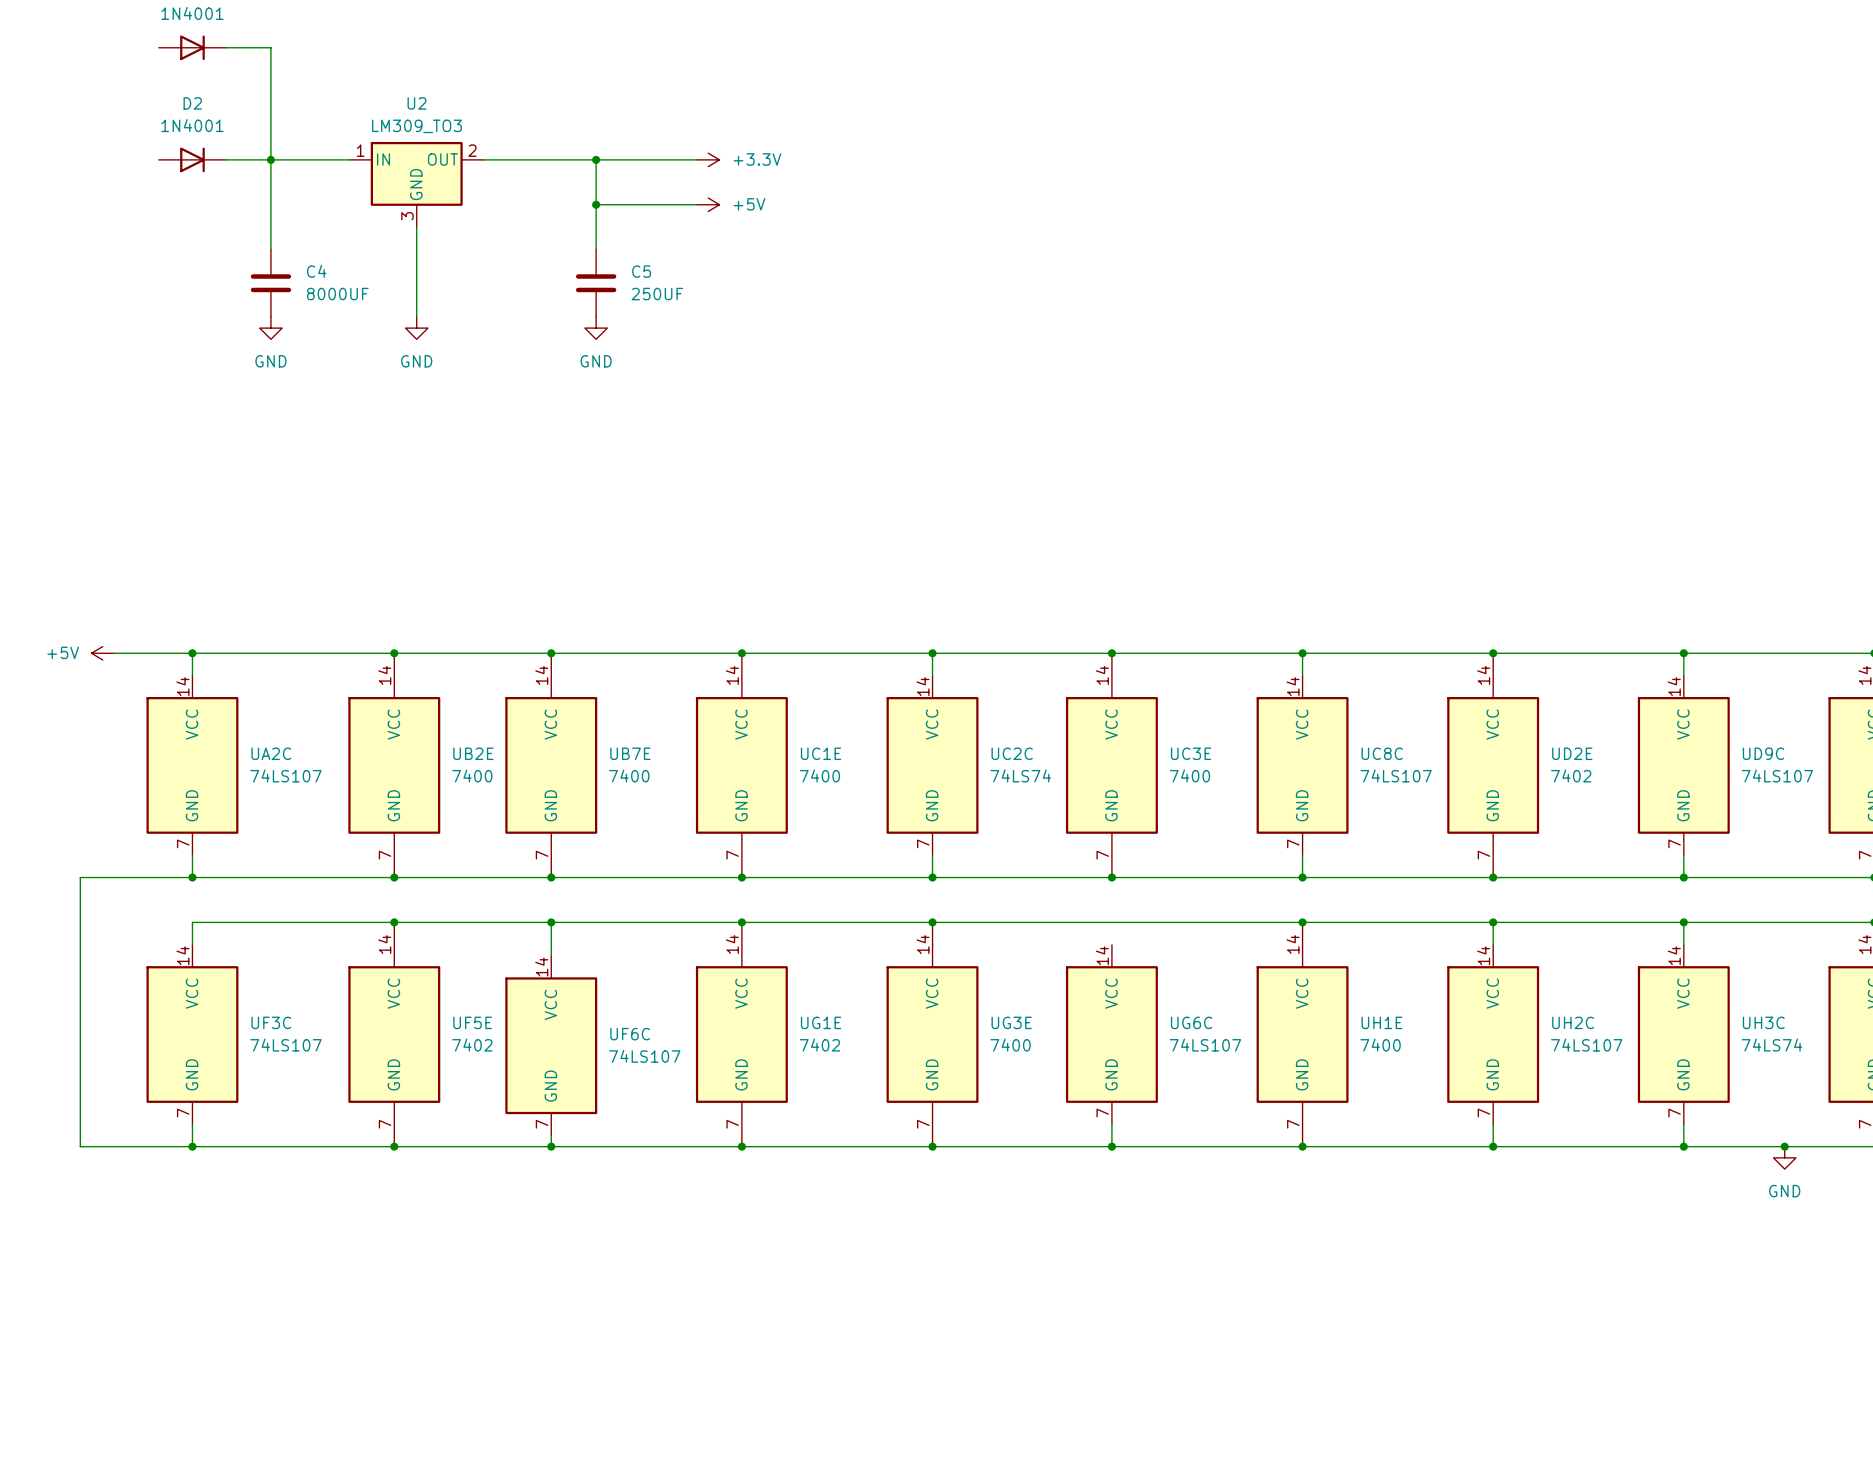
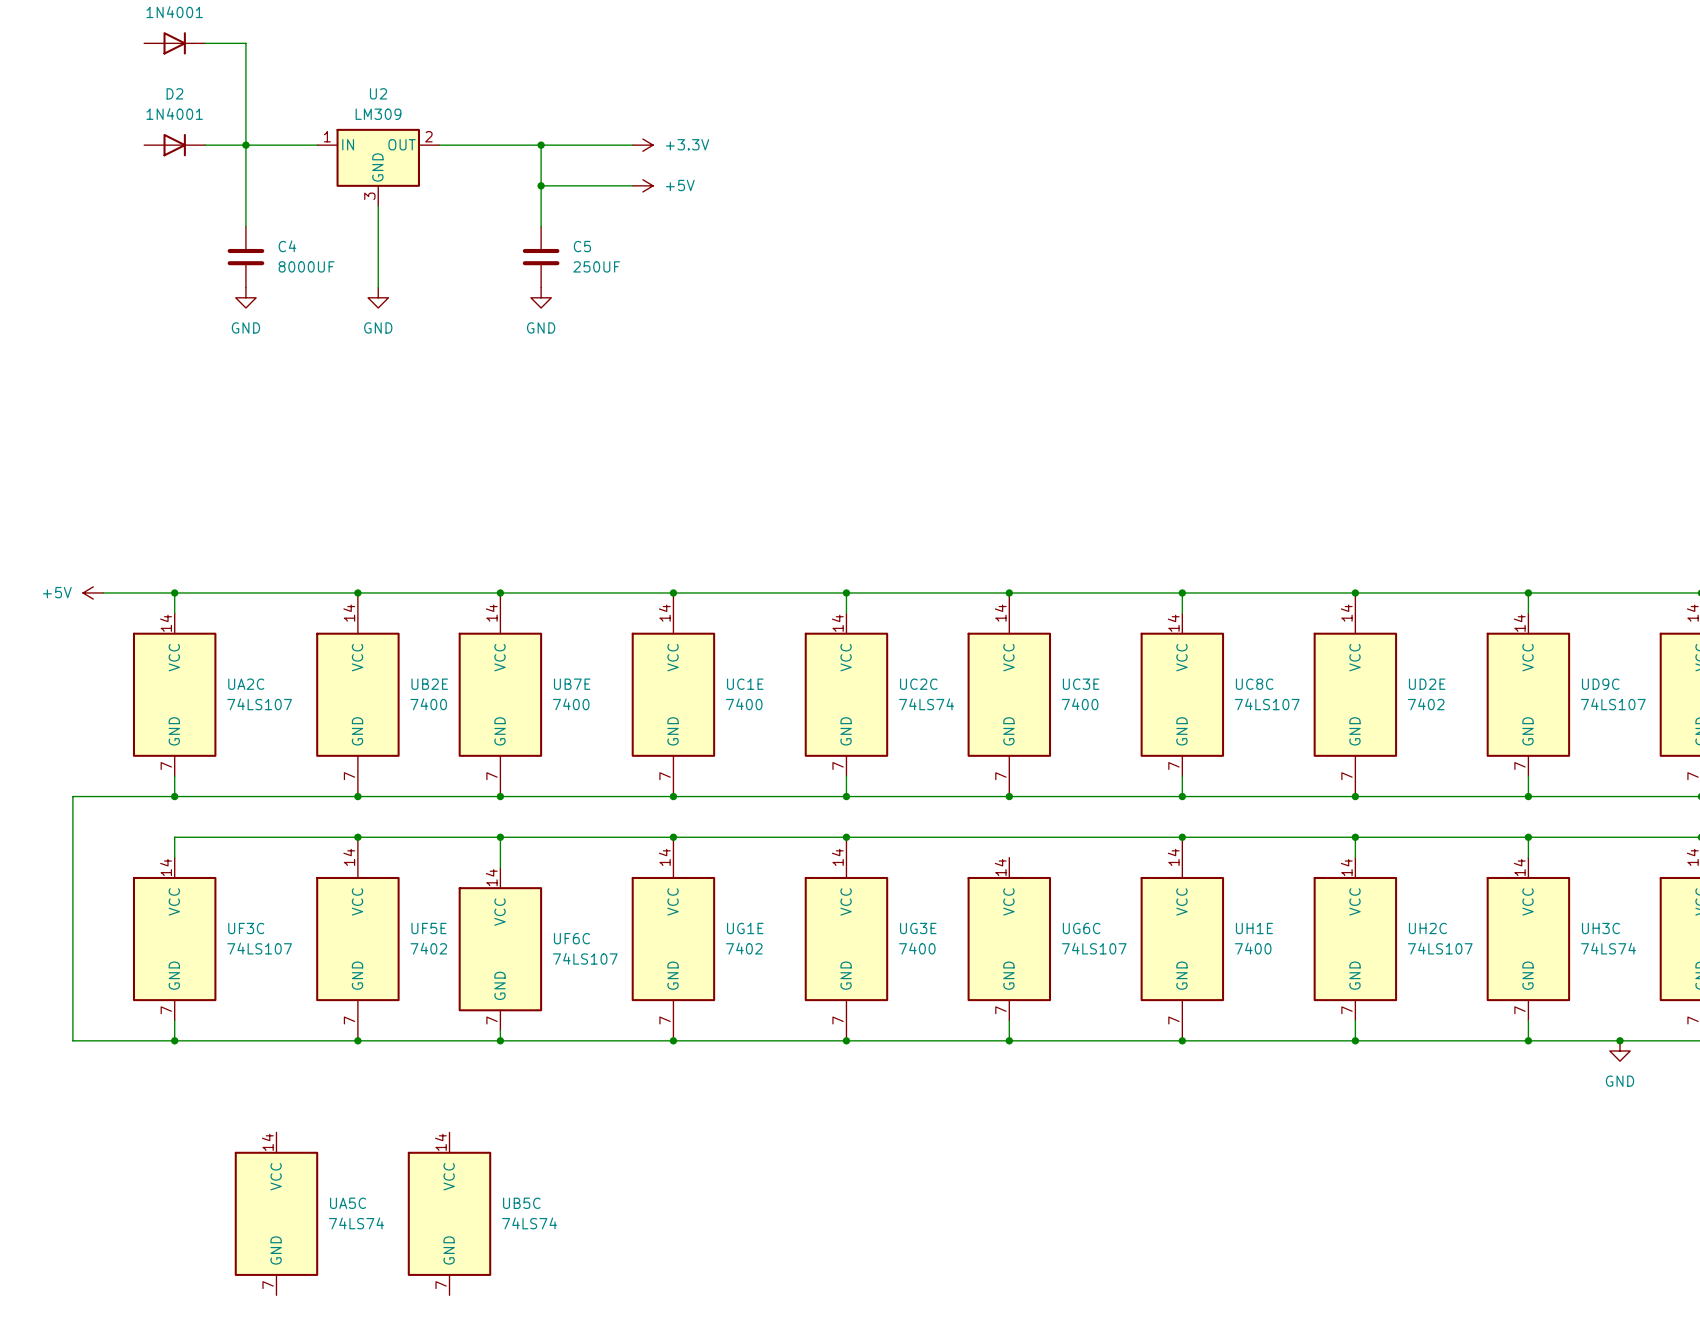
U2 value: LM309_TO3 (416, 126) -> LM309 (378, 114)
UA5C: none -> 74LS74 (276, 1213)
UB5C: none -> 74LS74 (449, 1213)

